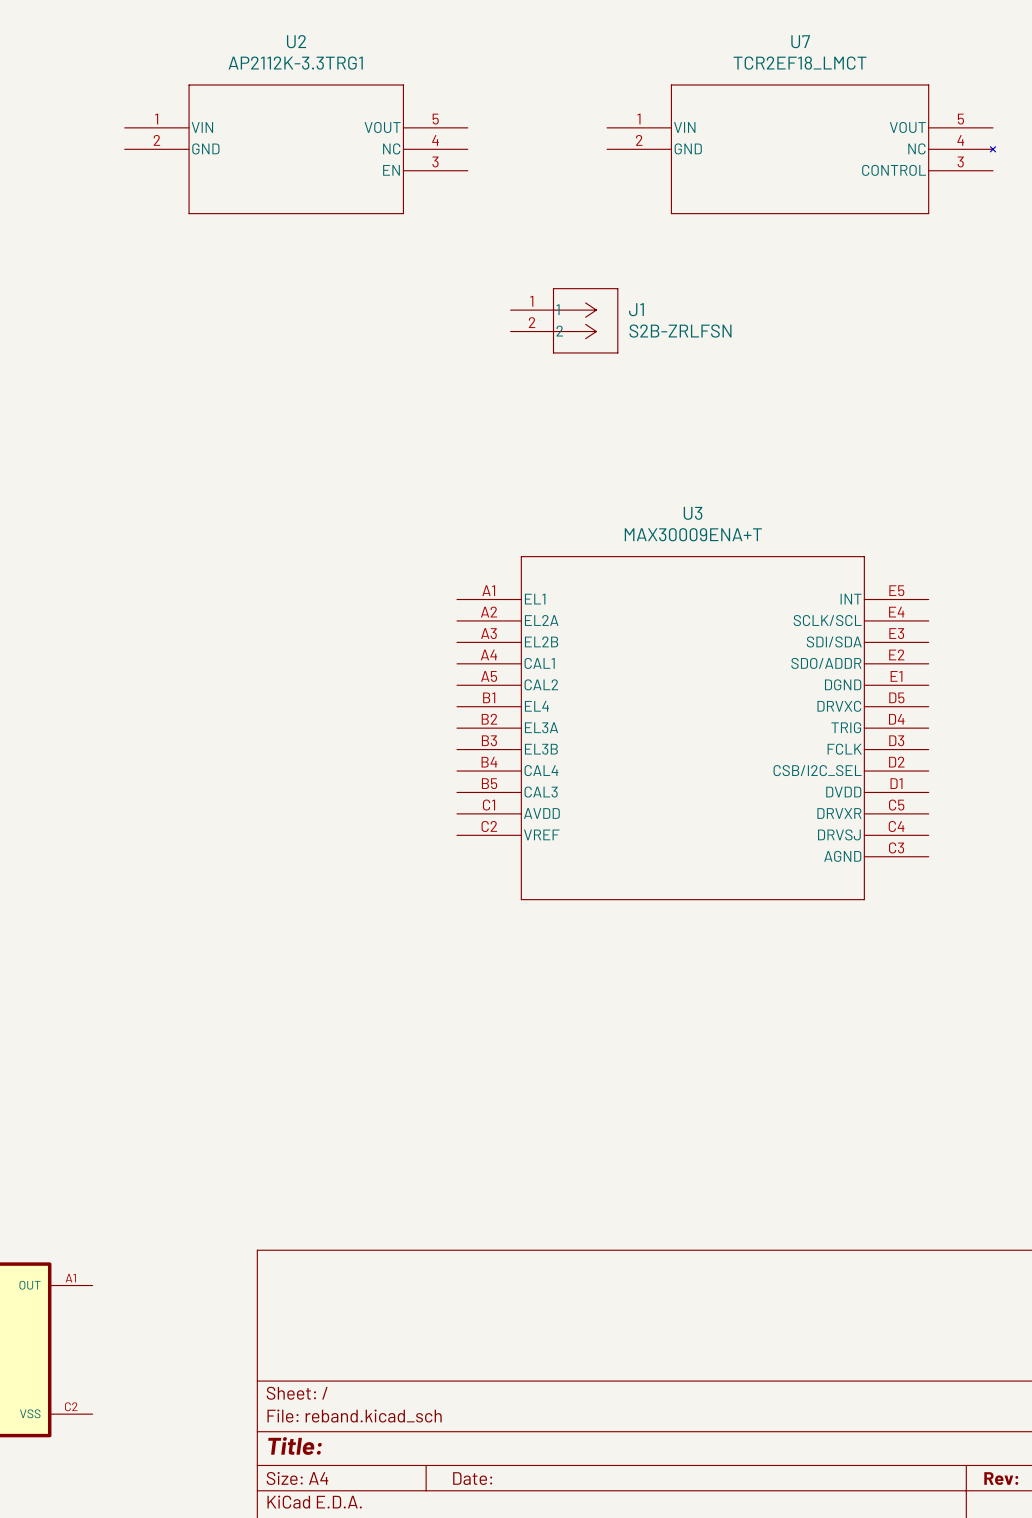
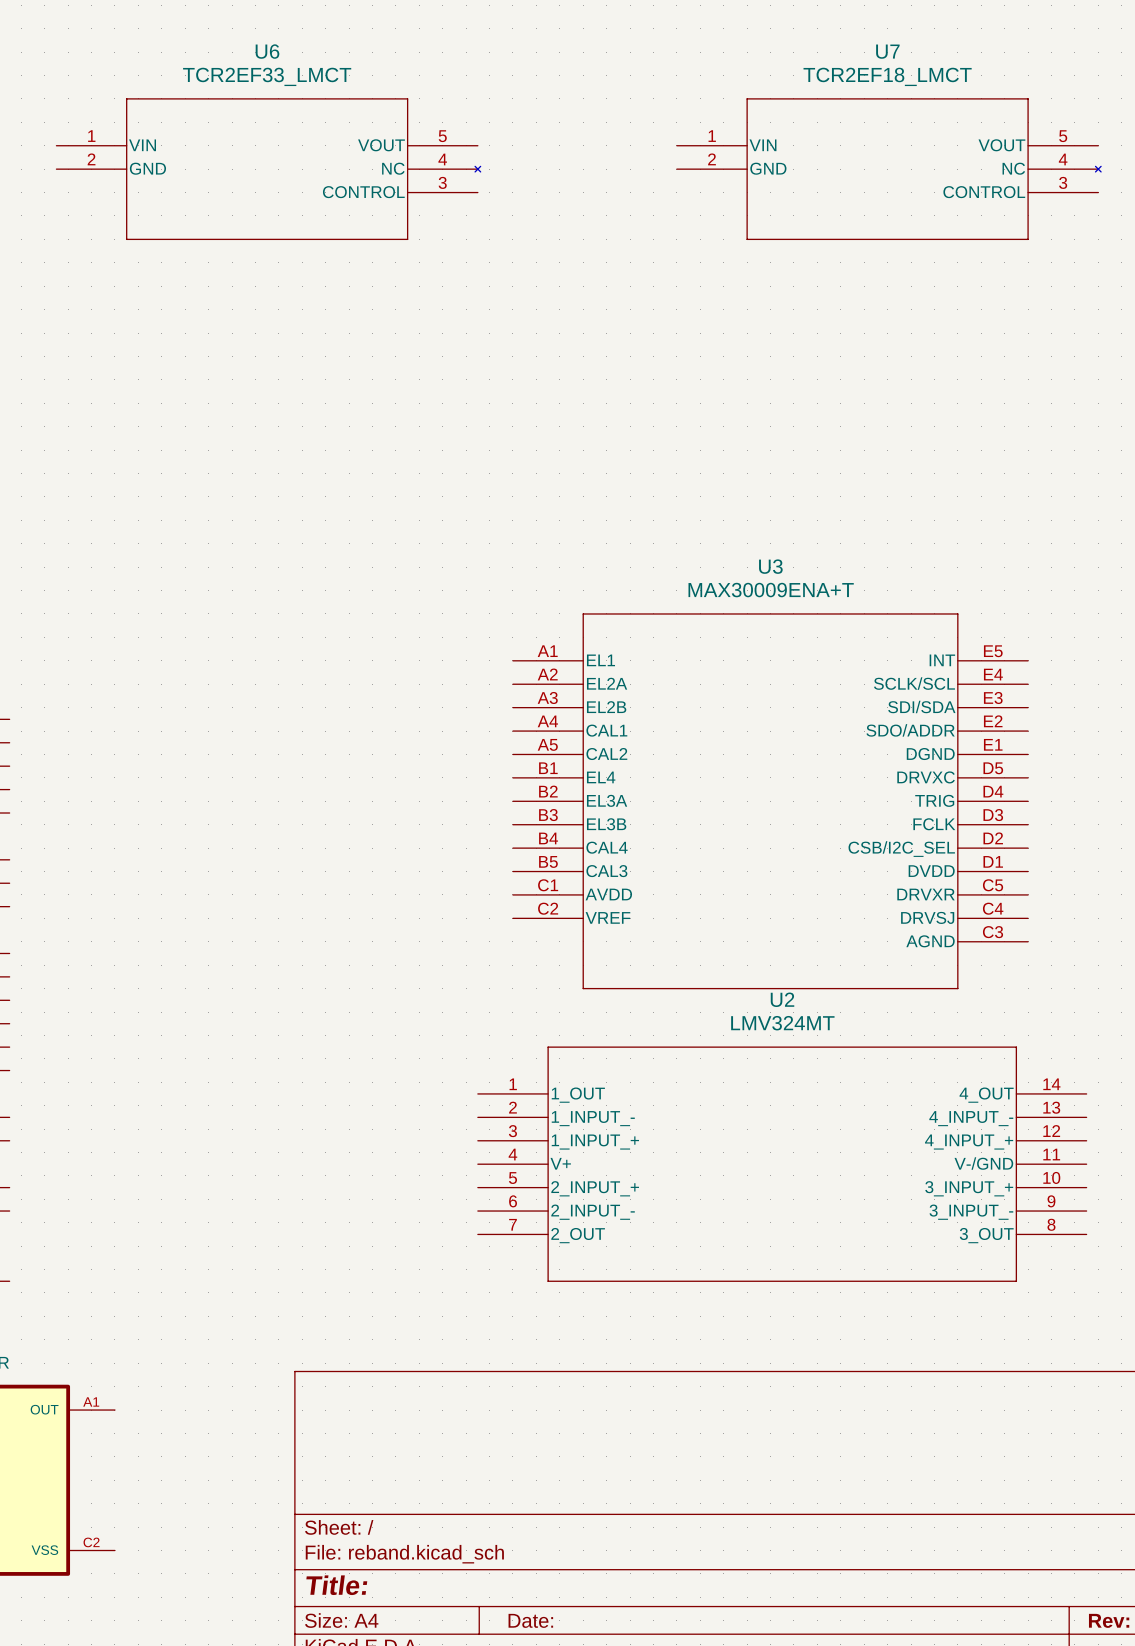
U2 name position: U2 (296, 41) -> U2 (782, 999)
U2 value: AP2112K-3.3TRG1 (295, 63) -> LMV324MT (782, 1023)
U2 symbol: [124, 84, 468, 215] -> [477, 1046, 1087, 1282]
U6: none -> TCR2EF33_LMCT (268, 169)
J1: S2B-ZRLFSN (564, 320) -> none

